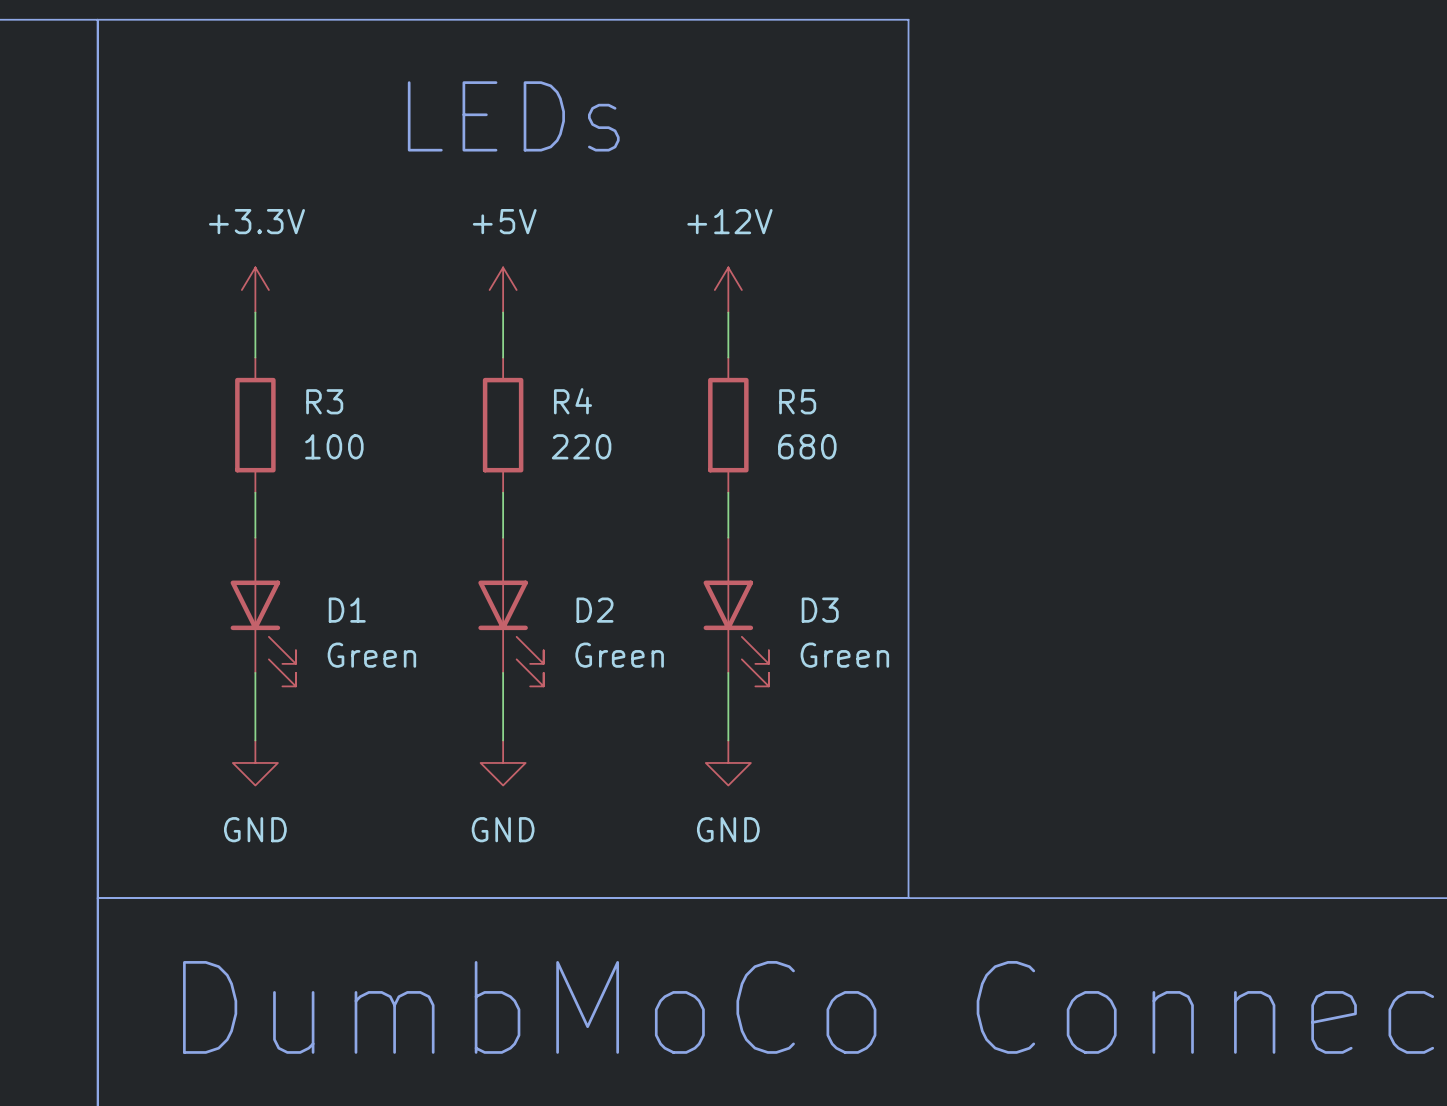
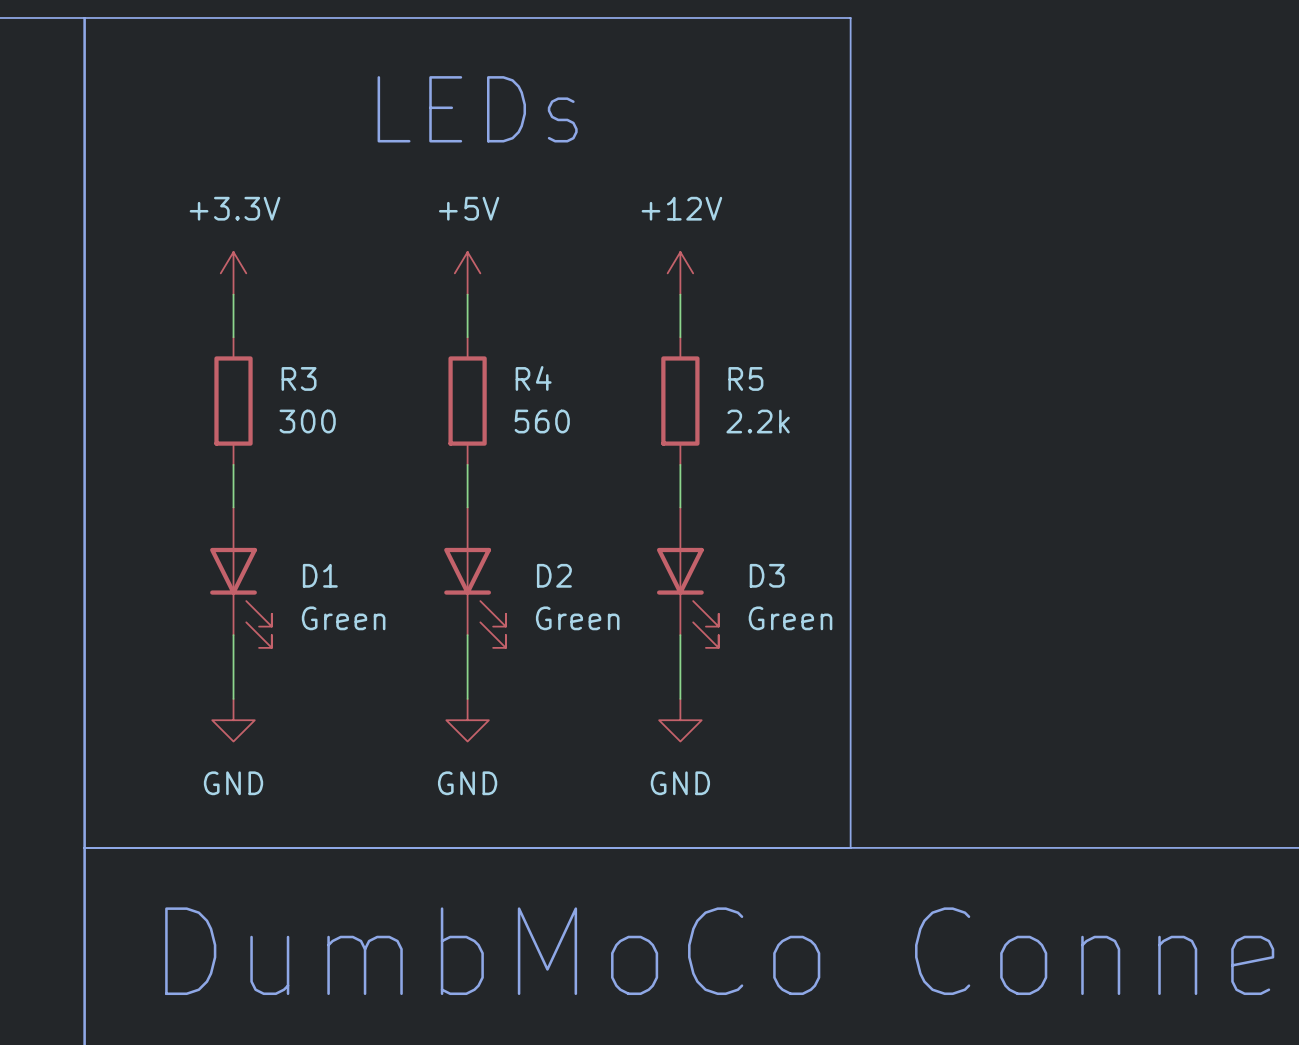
R3 value: 100 (334, 446) -> 300 (307, 421)
R4 value: 220 (581, 446) -> 560 (542, 421)
R5 value: 680 (807, 446) -> 2.2k (758, 421)

